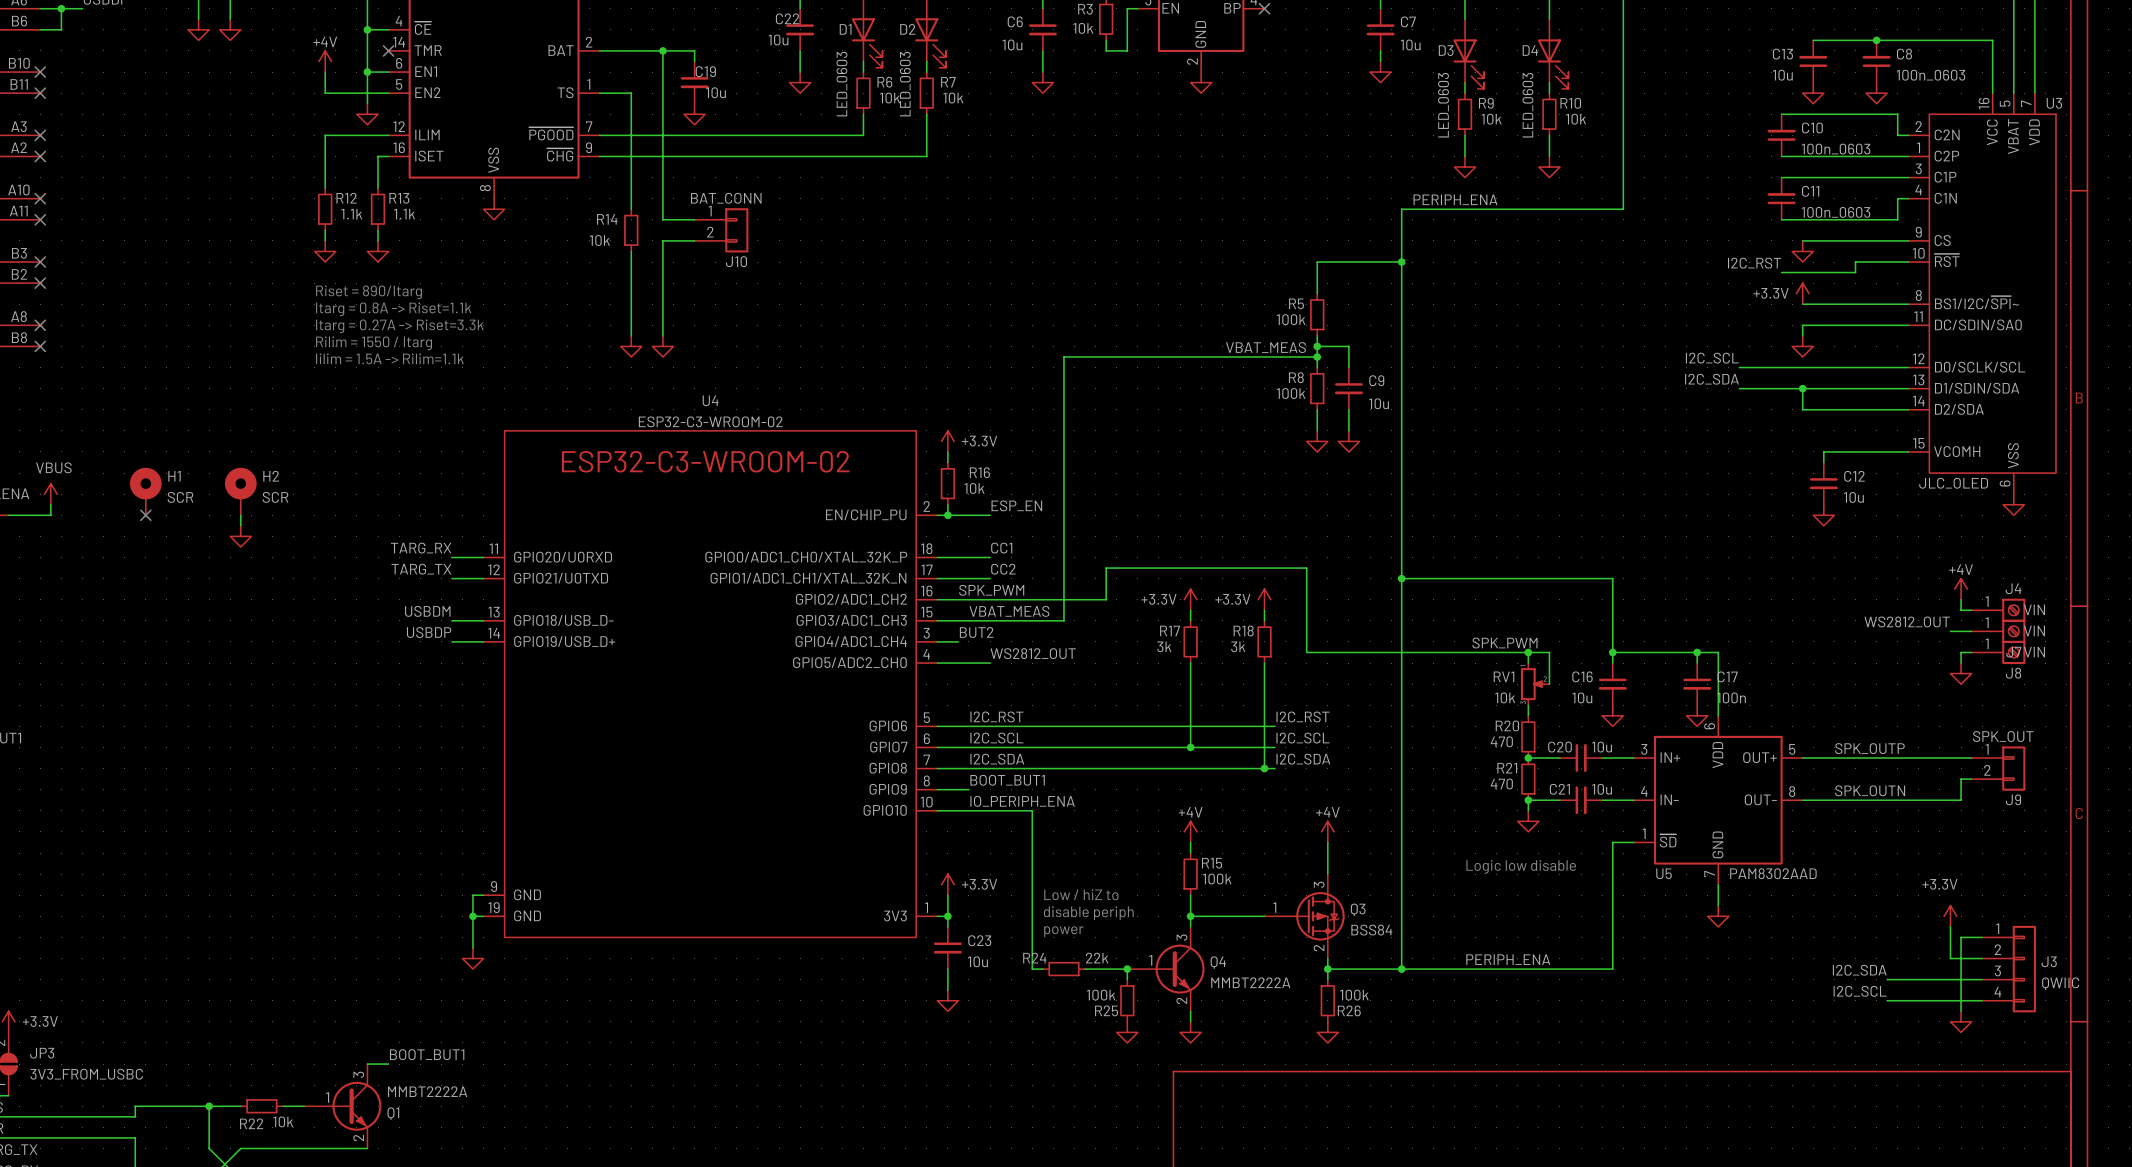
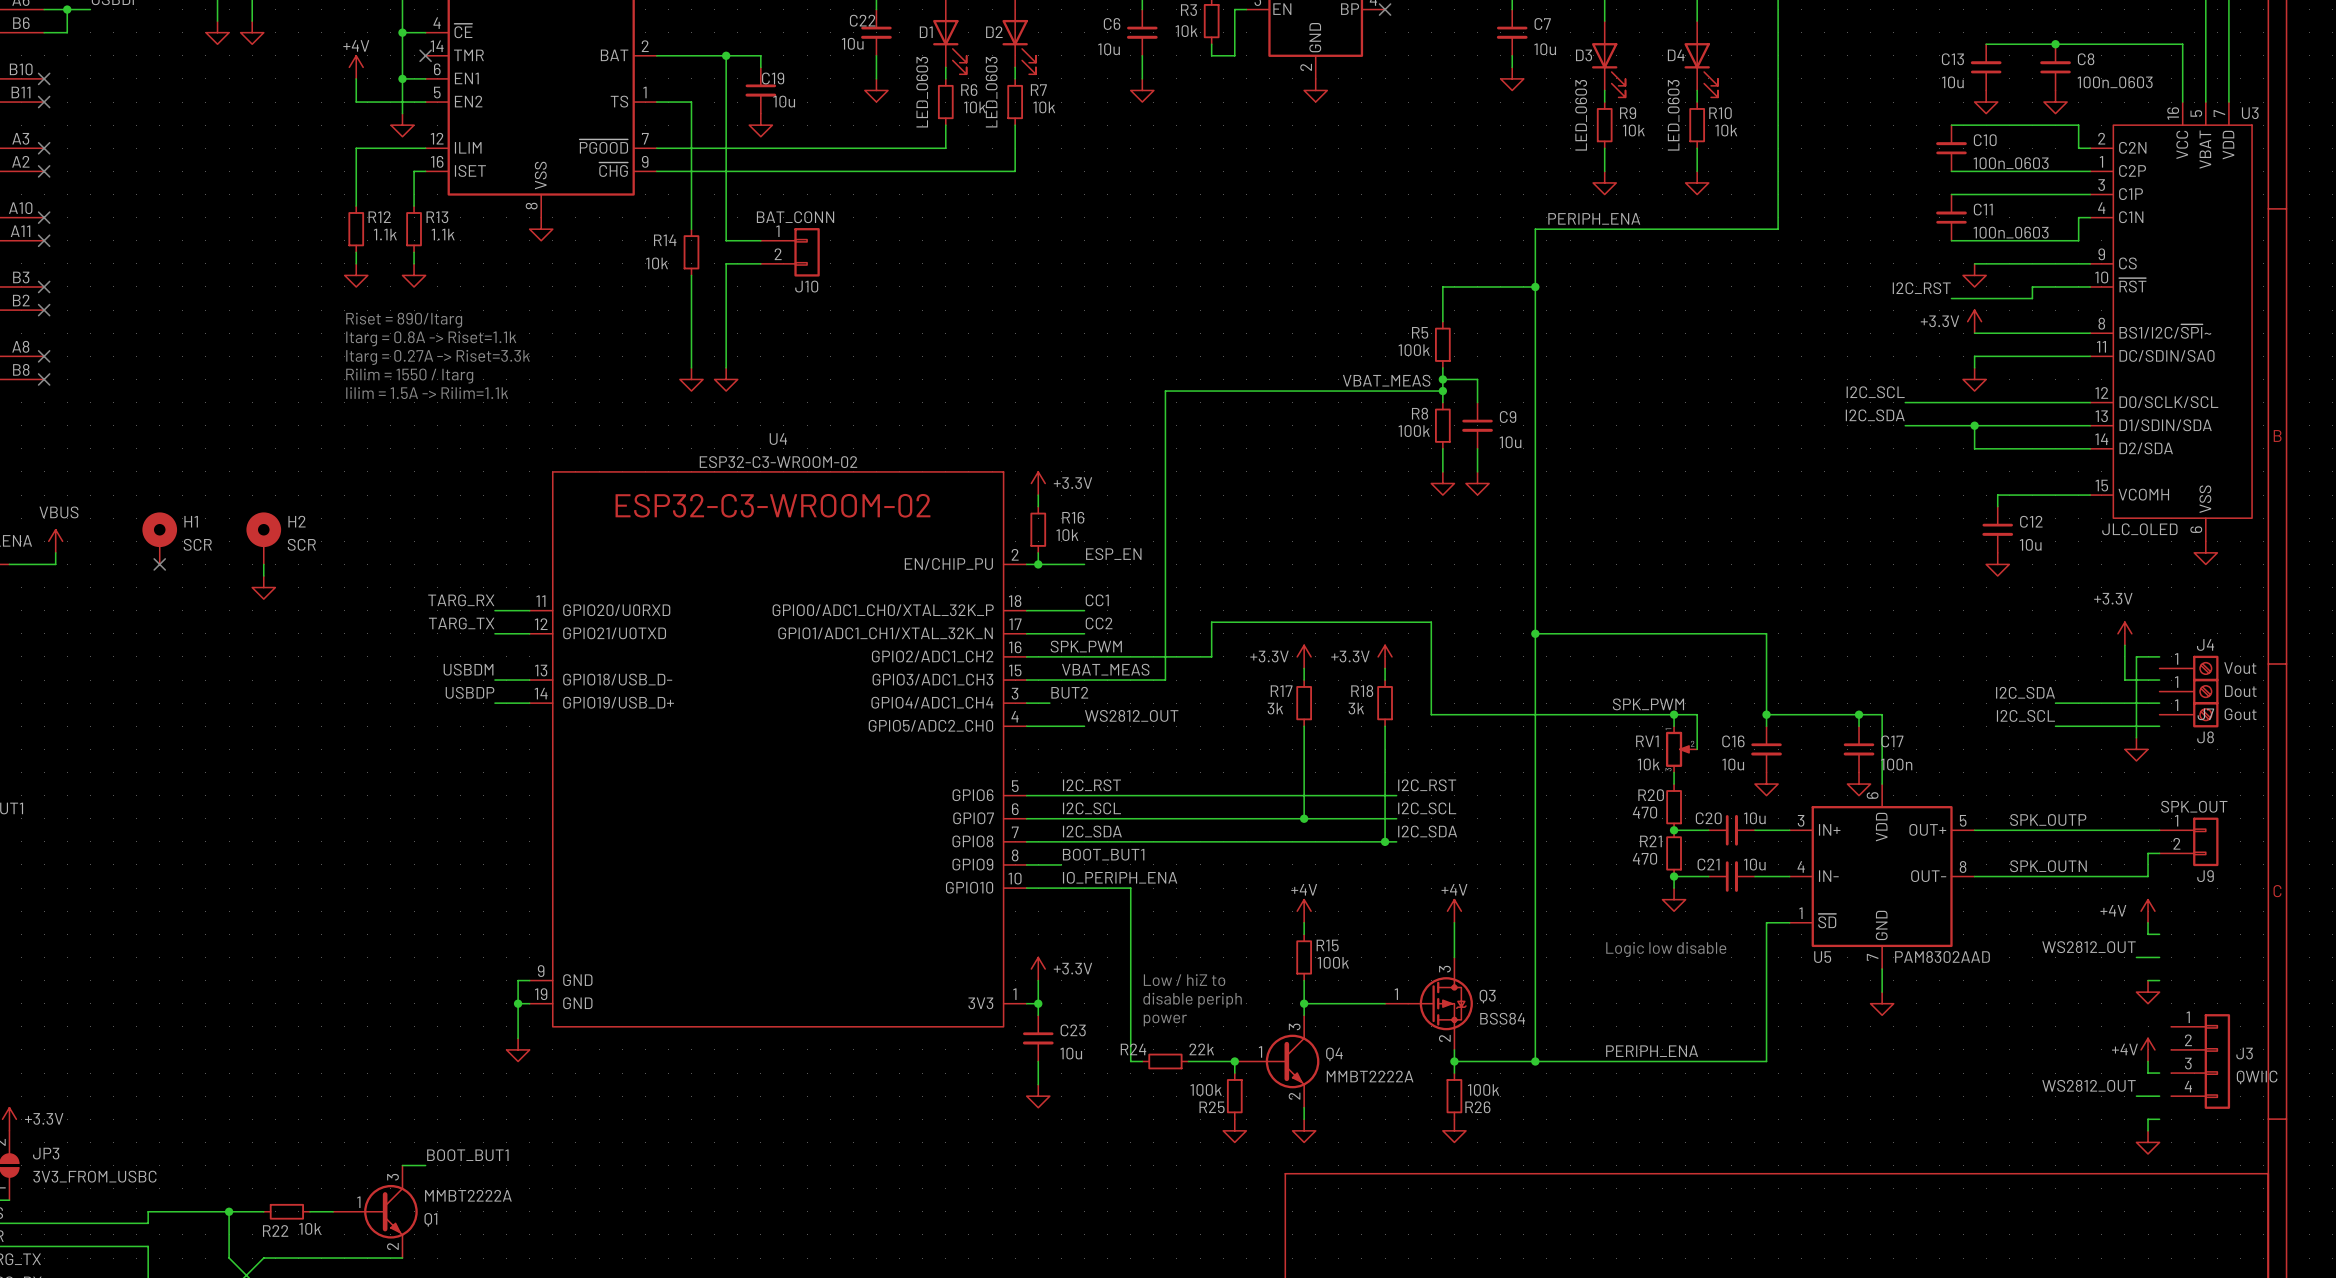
power symbol: none -> +3.3V (2124, 633)
wire: none -> (2124, 645) (2124, 680) (2159, 680)
power symbol: +4V (1961, 589) -> none
wire: (1961, 599) (1961, 610) (1971, 610) -> none
wire: none -> (2159, 656) (2136, 656) (2136, 737)
J4 value: VIN (2034, 609) -> Vout (2240, 668)
label: WS2812_OUT (1907, 621) -> none
J7 value: VIN (2034, 630) -> Dout (2240, 691)
wire: (1950, 631) (1971, 631) -> none
label: none -> I2C_SDA (2025, 692)
wire: none -> (2055, 703) (2159, 703)
wire: (1971, 652) (1961, 652) (1961, 663) -> none
J8 value: VIN (2034, 652) -> Gout (2240, 714)
label: none -> I2C_SCL (2025, 715)
wire: none -> (2055, 726) (2159, 726)
power symbol position: (1961, 673) -> (2136, 749)
power symbol: none -> +4V (2148, 911)
wire: none -> (2148, 922) (2148, 934) (2159, 934)
label: none -> WS2812_OUT (2089, 947)
wire: none -> (2136, 957) (2159, 957)
power symbol: none -> (2148, 992)
power symbol: +3.3V (1950, 916) -> none
wire: (1950, 926) (1950, 958) (1982, 958) -> none
wire: (1982, 937) (1961, 937) (1961, 969) -> none
power symbol: none -> +4V (2148, 1049)
label: I2C_SDA (1859, 970) -> none
wire: (1887, 979) (1961, 979) (1961, 1011) -> none
wire: (1971, 979) (1982, 979) -> (2148, 980) (2159, 980)
label: I2C_SCL (1860, 991) -> none
label: none -> WS2812_OUT (2089, 1085)
wire: (1887, 1000) (1950, 1000) -> none
wire: (1971, 1000) (1982, 1000) -> none
power symbol position: (1961, 1021) -> (2148, 1142)

